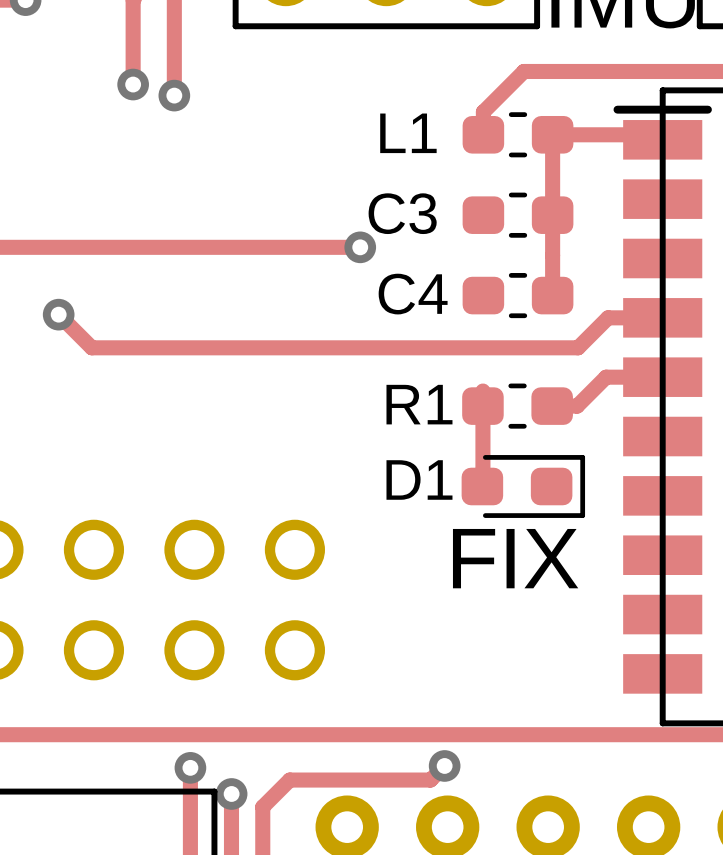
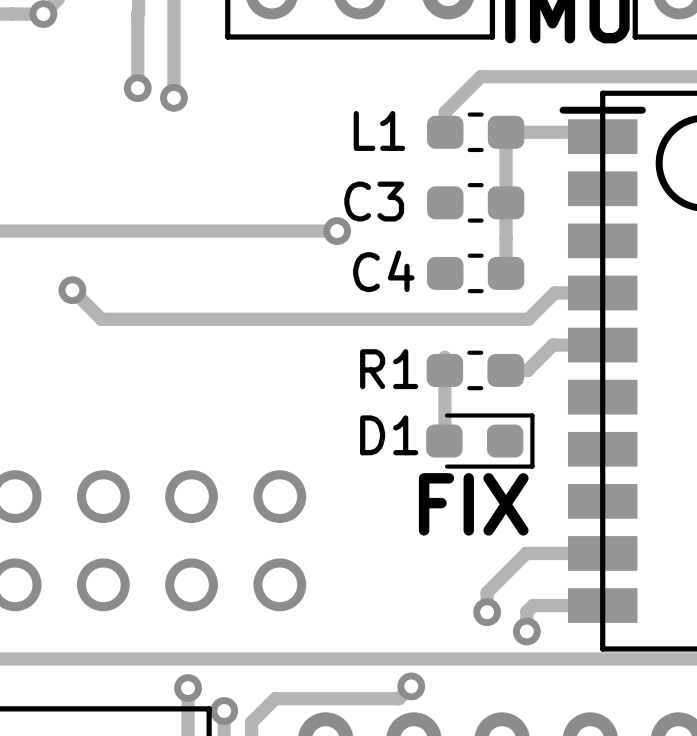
track: none -> (602, 553) (526, 553) (487, 592) (487, 612)
track: none -> (602, 605) (533, 605) (526, 611) (526, 631)
via: none -> (487, 612)
via: none -> (526, 631)

